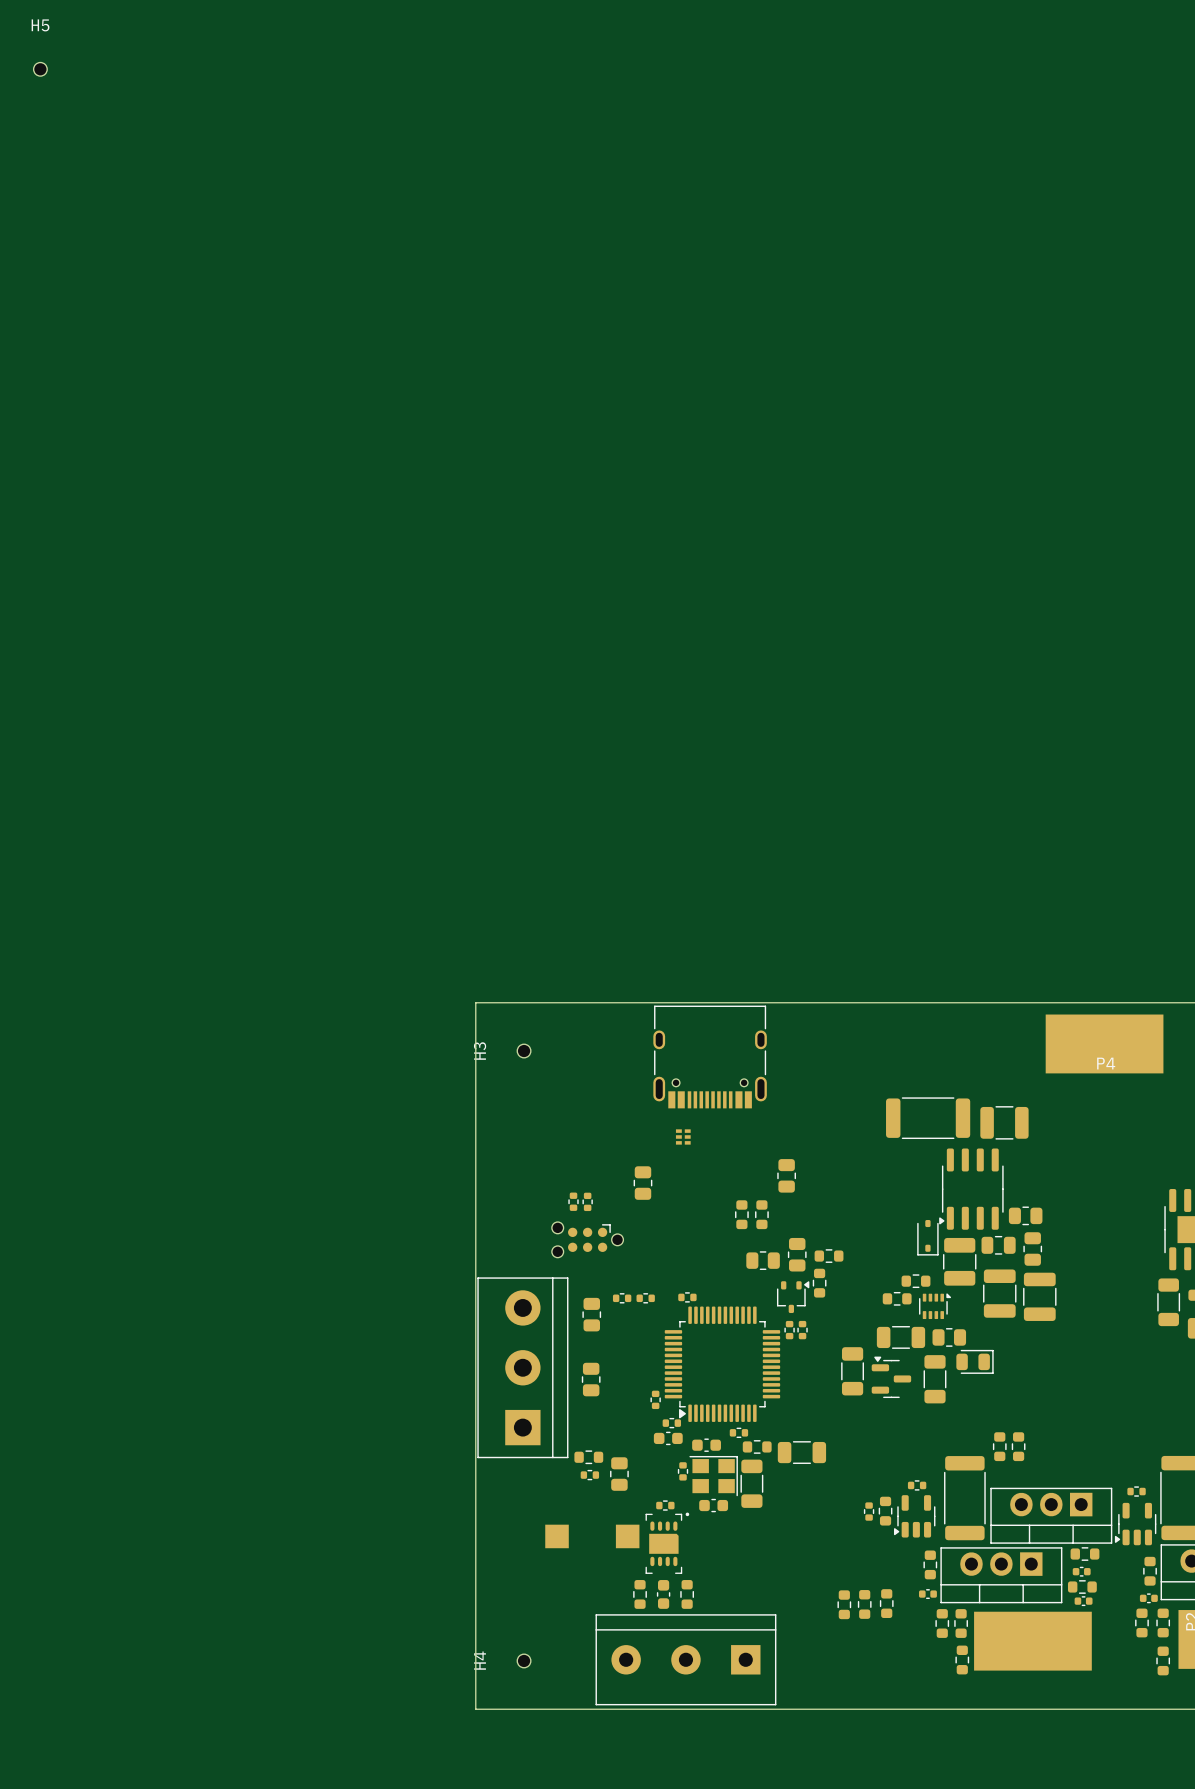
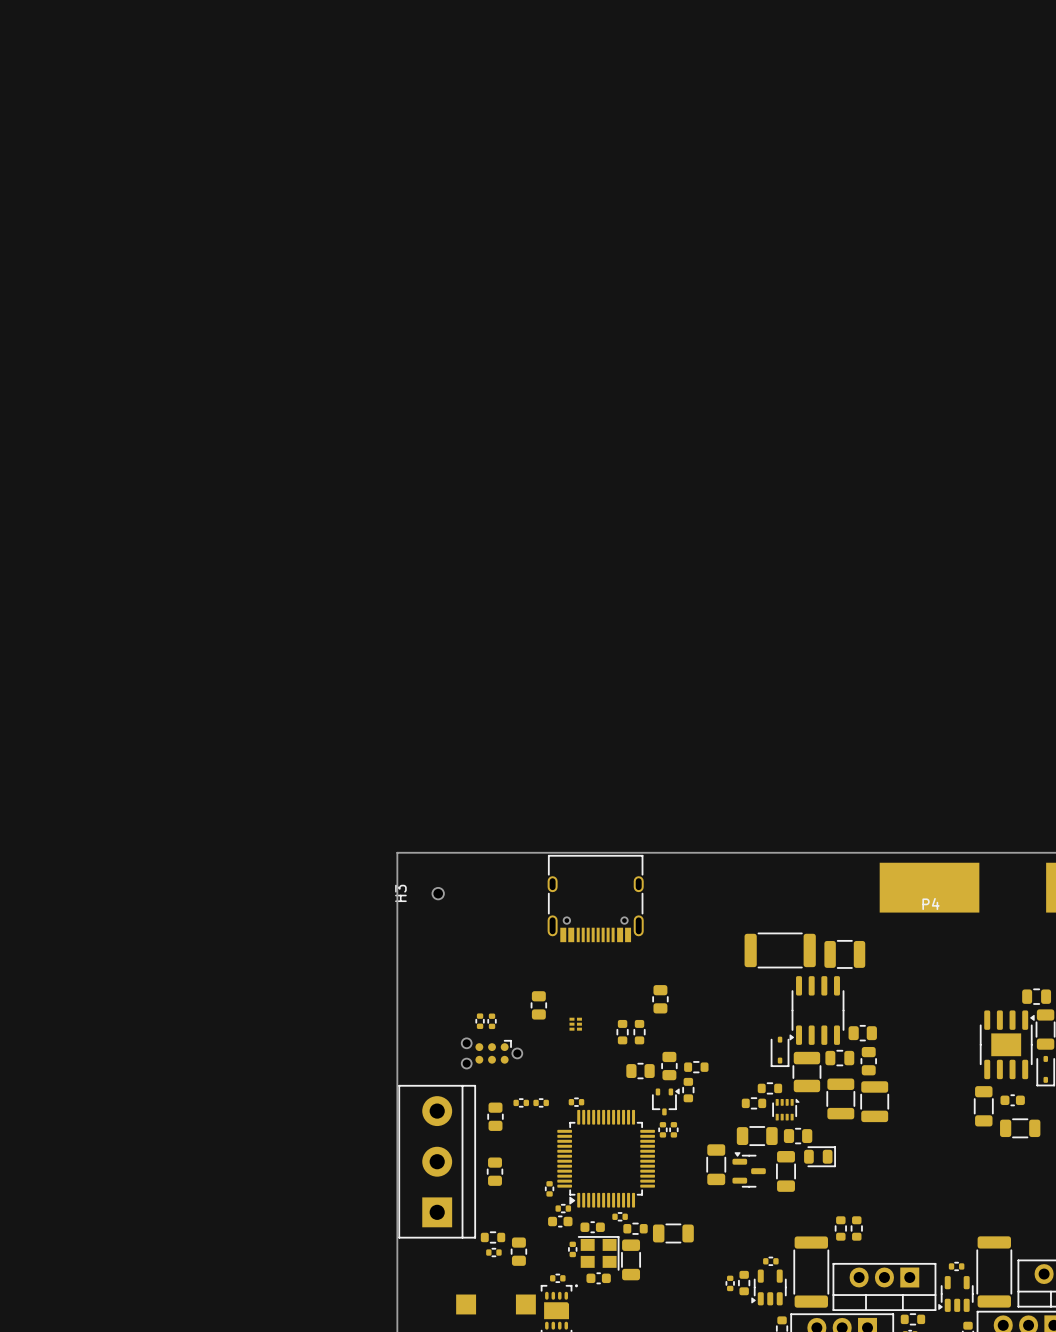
H5: (40, 69) -> none
part position: (683, 1136) -> (575, 1024)

